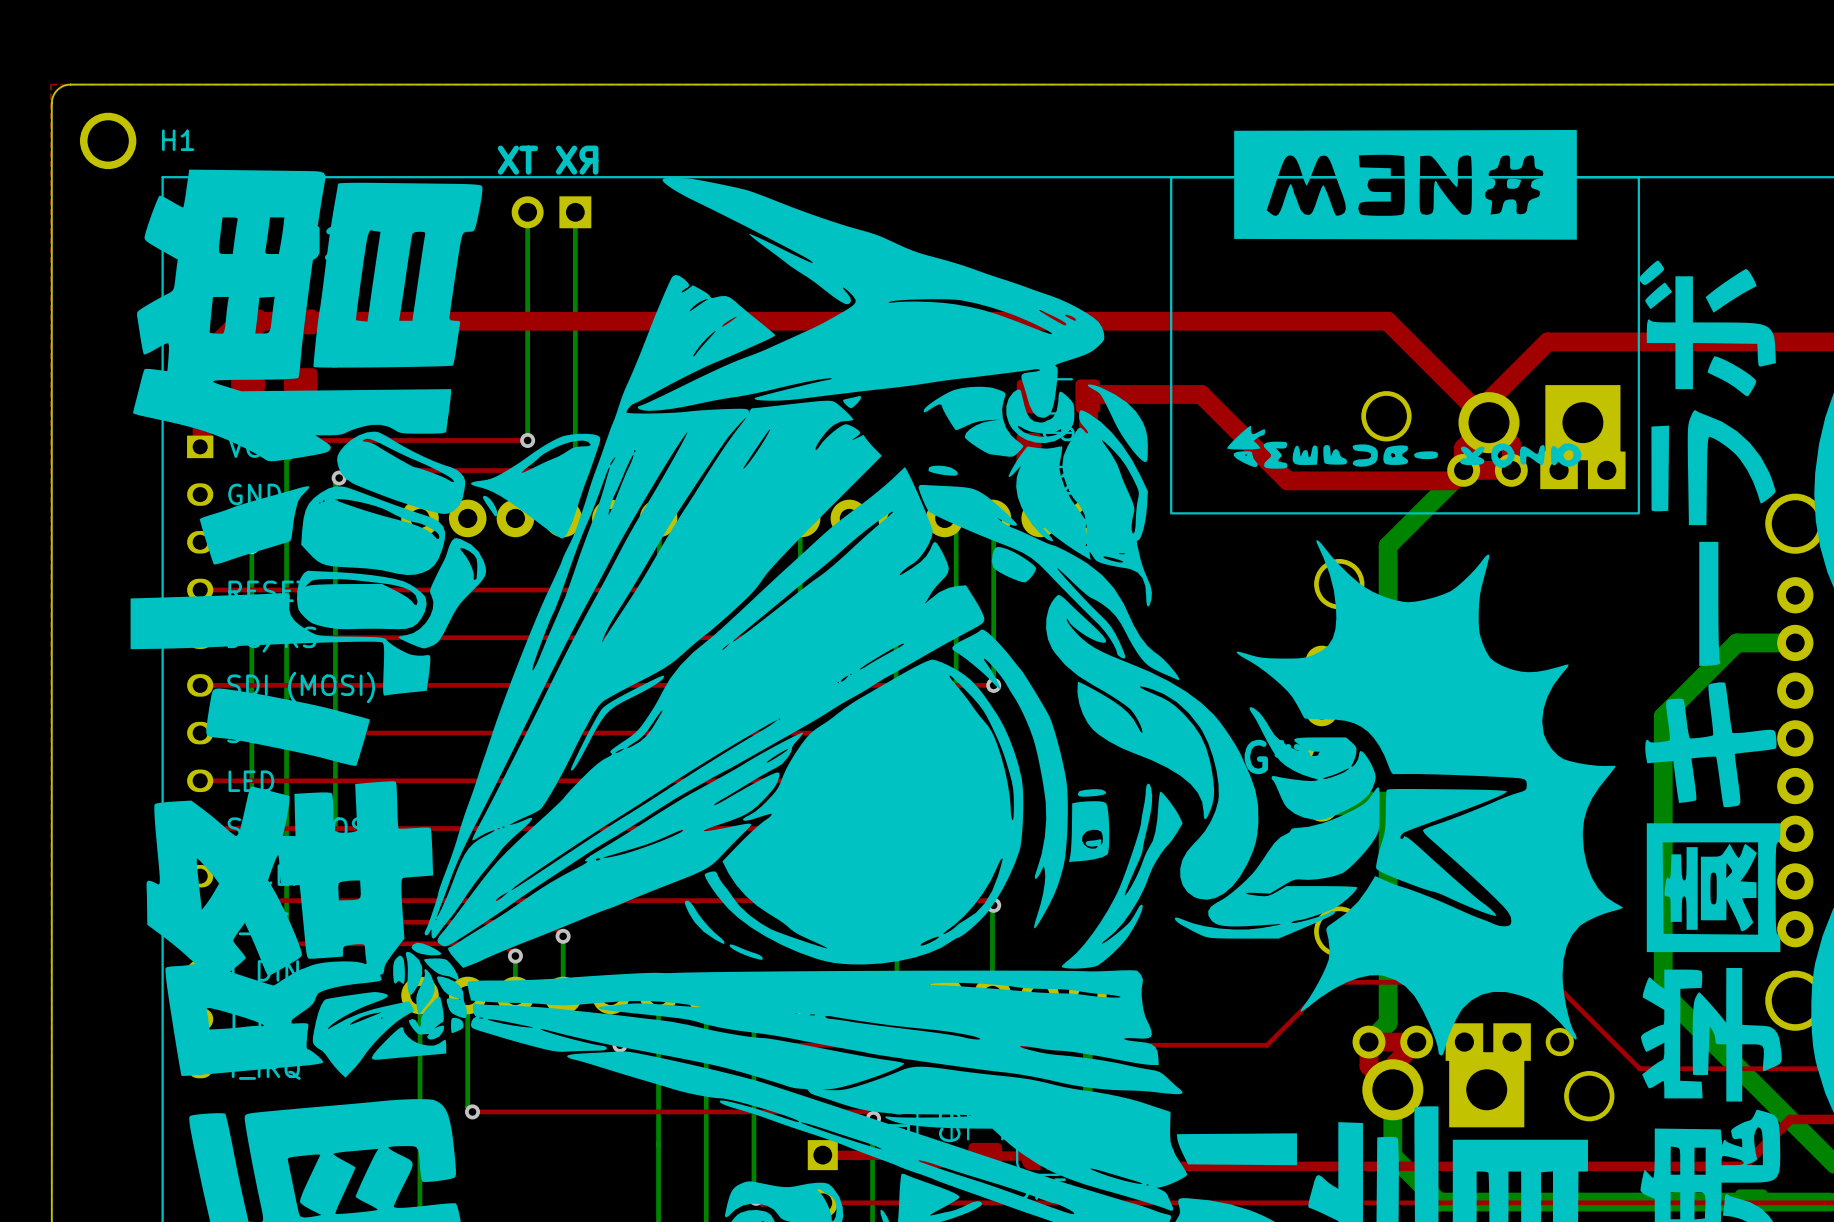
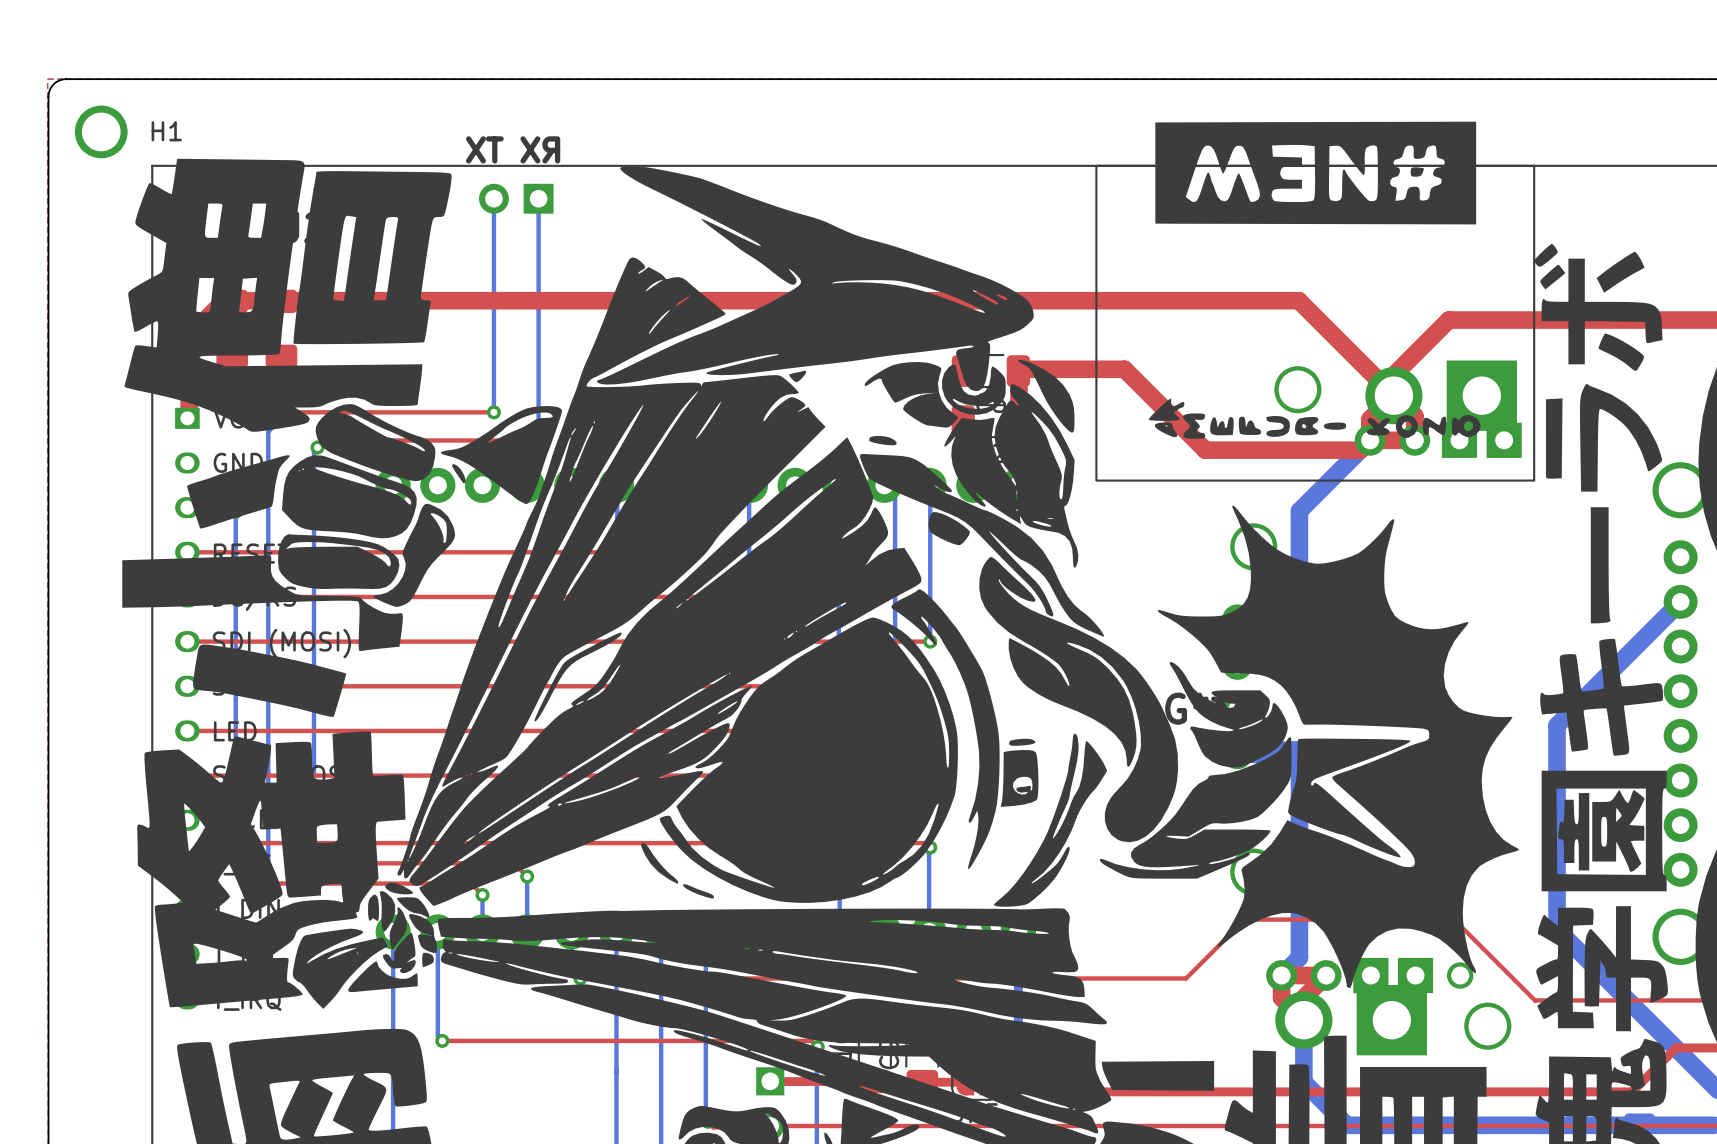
bottom track: (1795, 642) (1736, 642) (1663, 716) (1663, 774) -> (1680, 601) (1557, 725)

